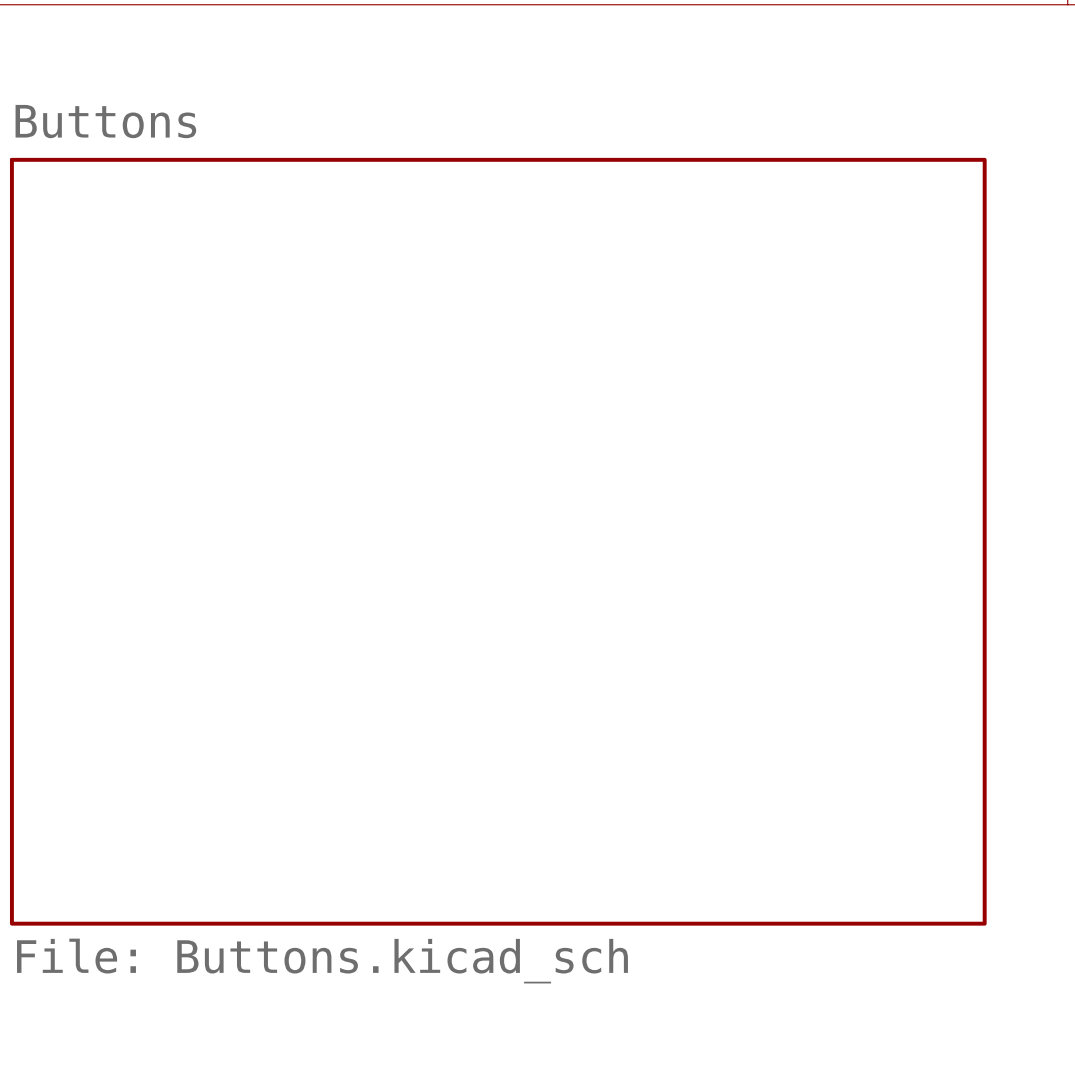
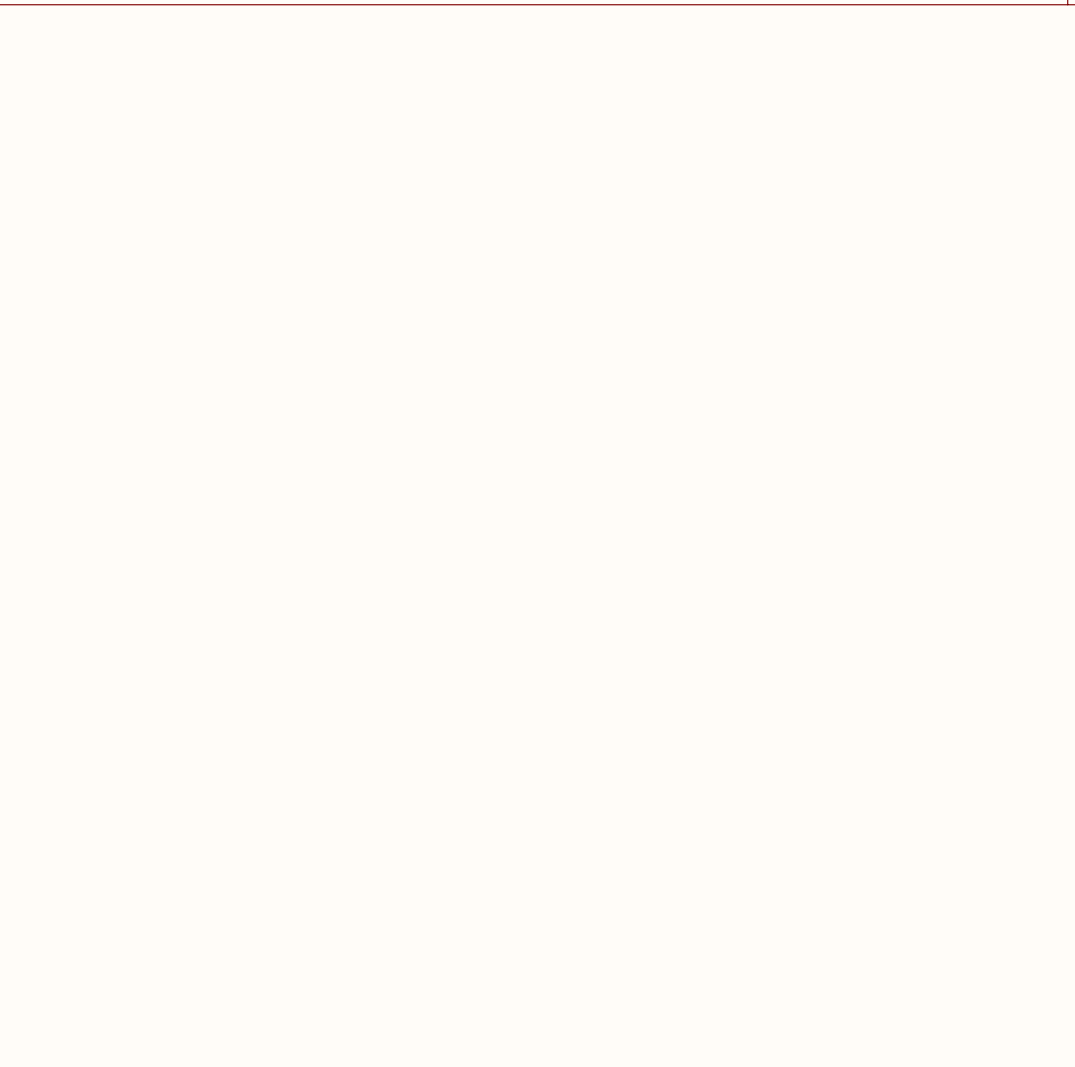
sheet Buttons: File: Buttons.kicad_sch (498, 541) -> none

